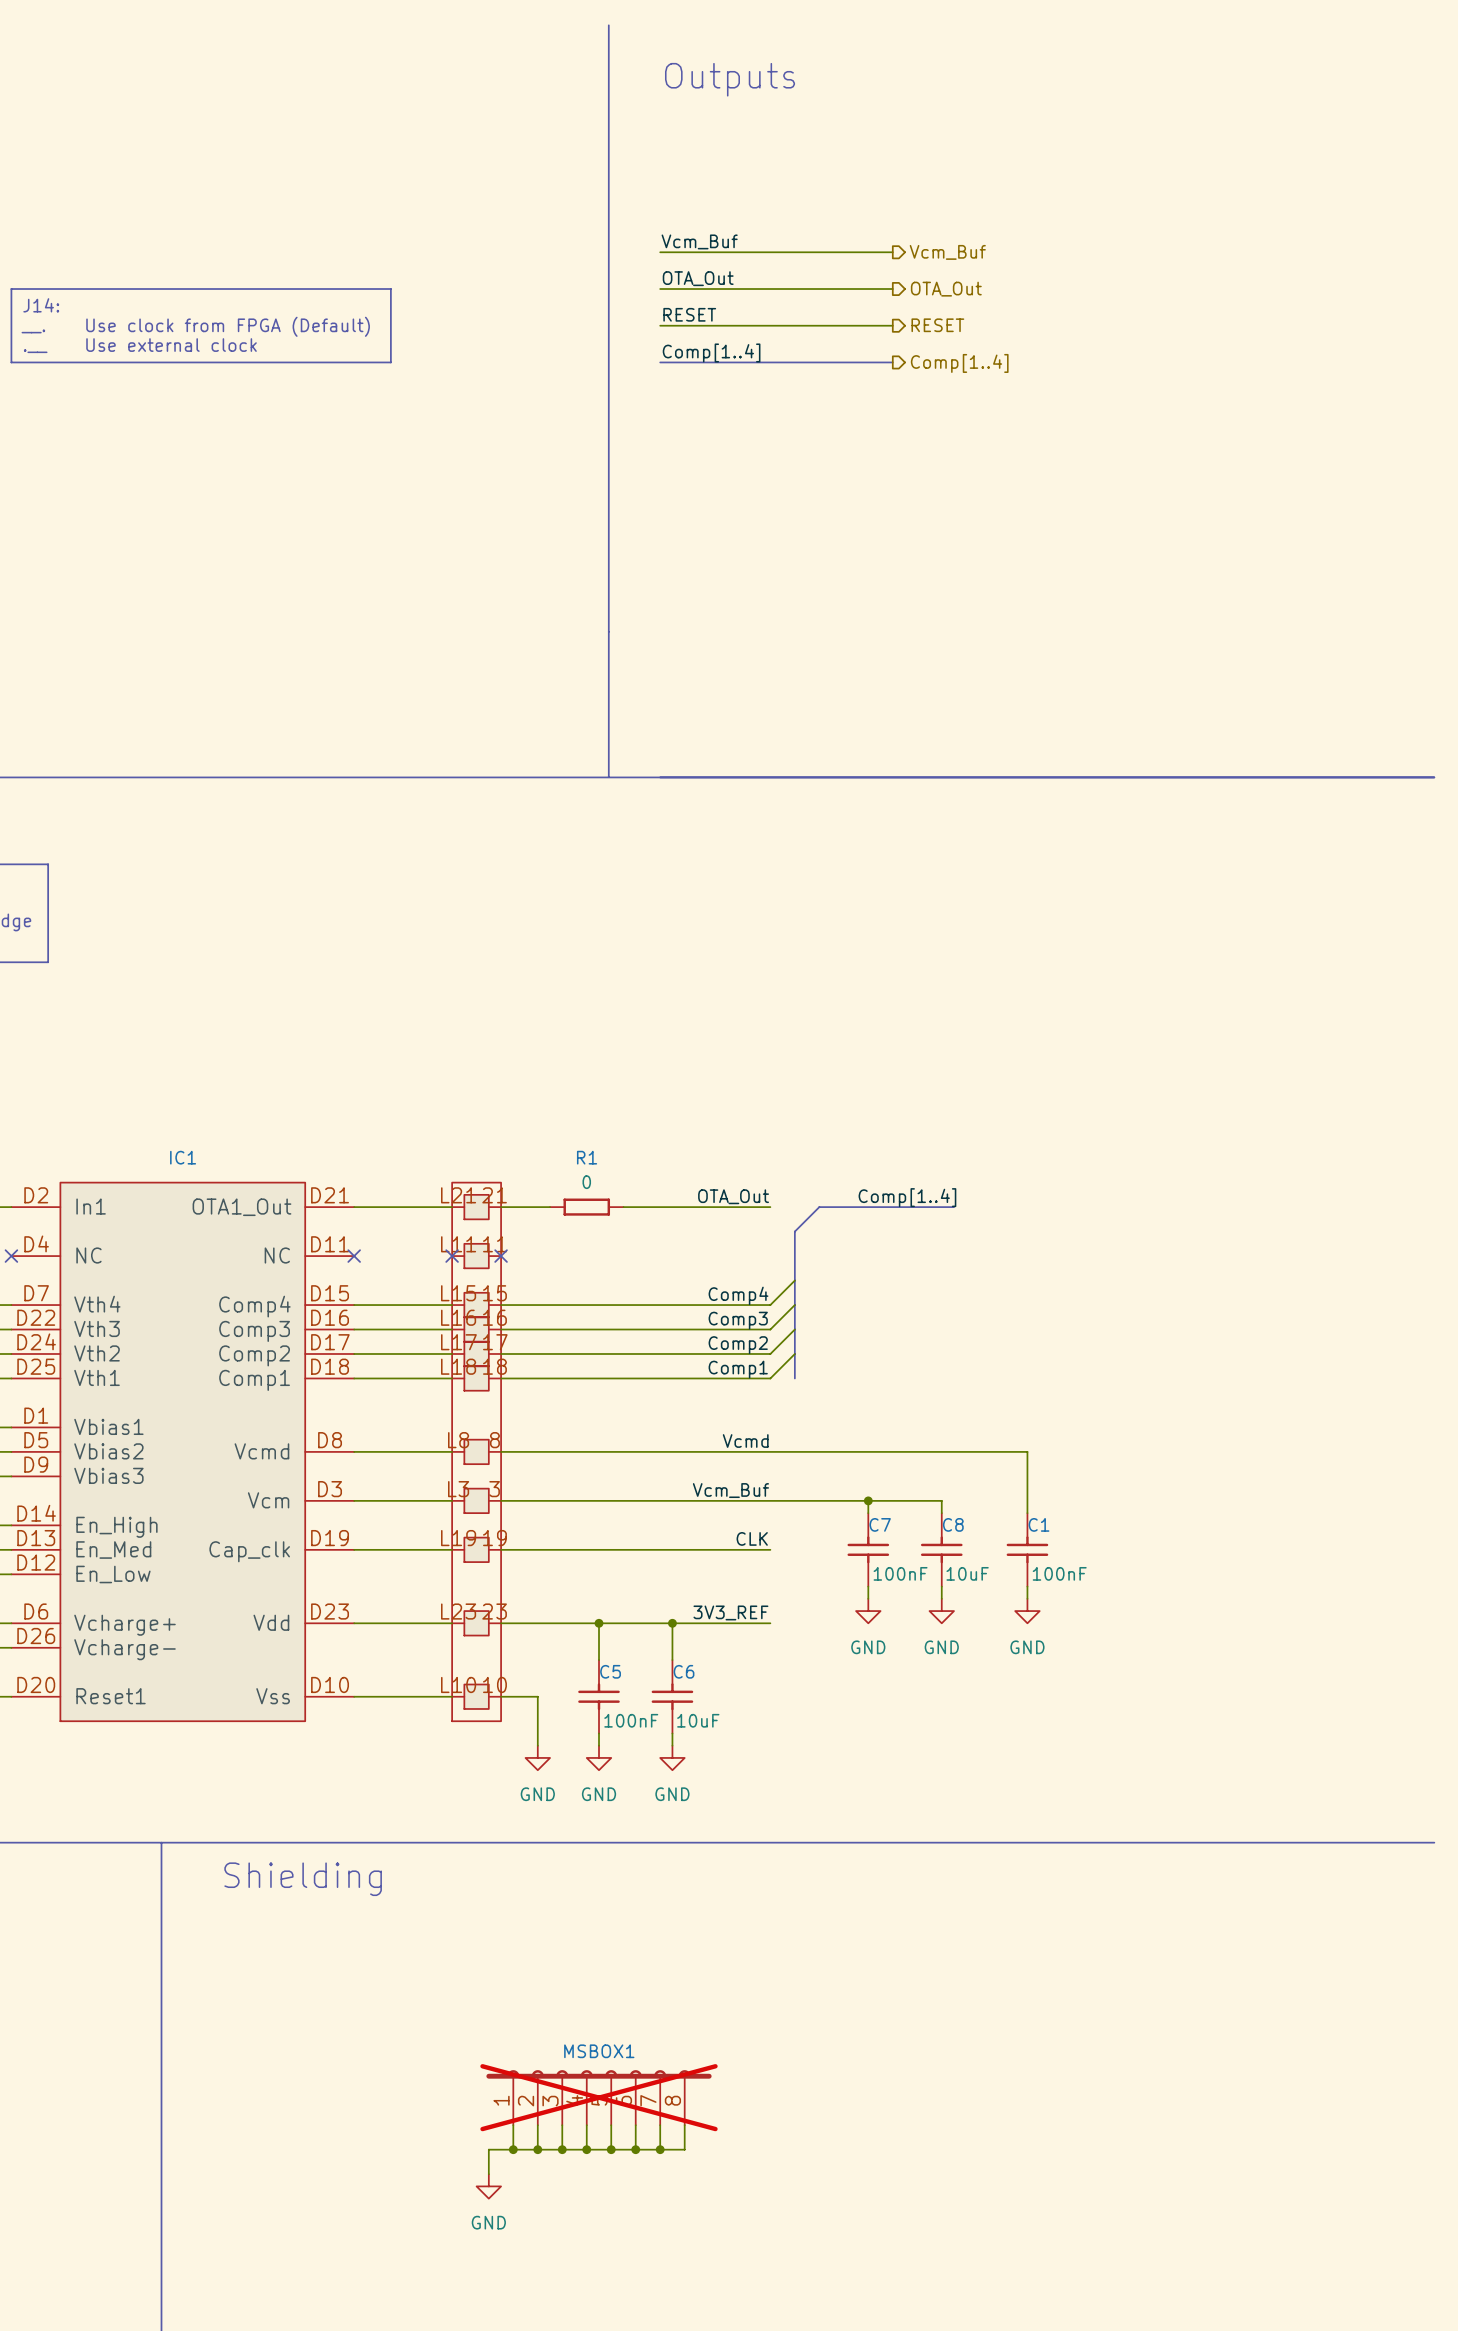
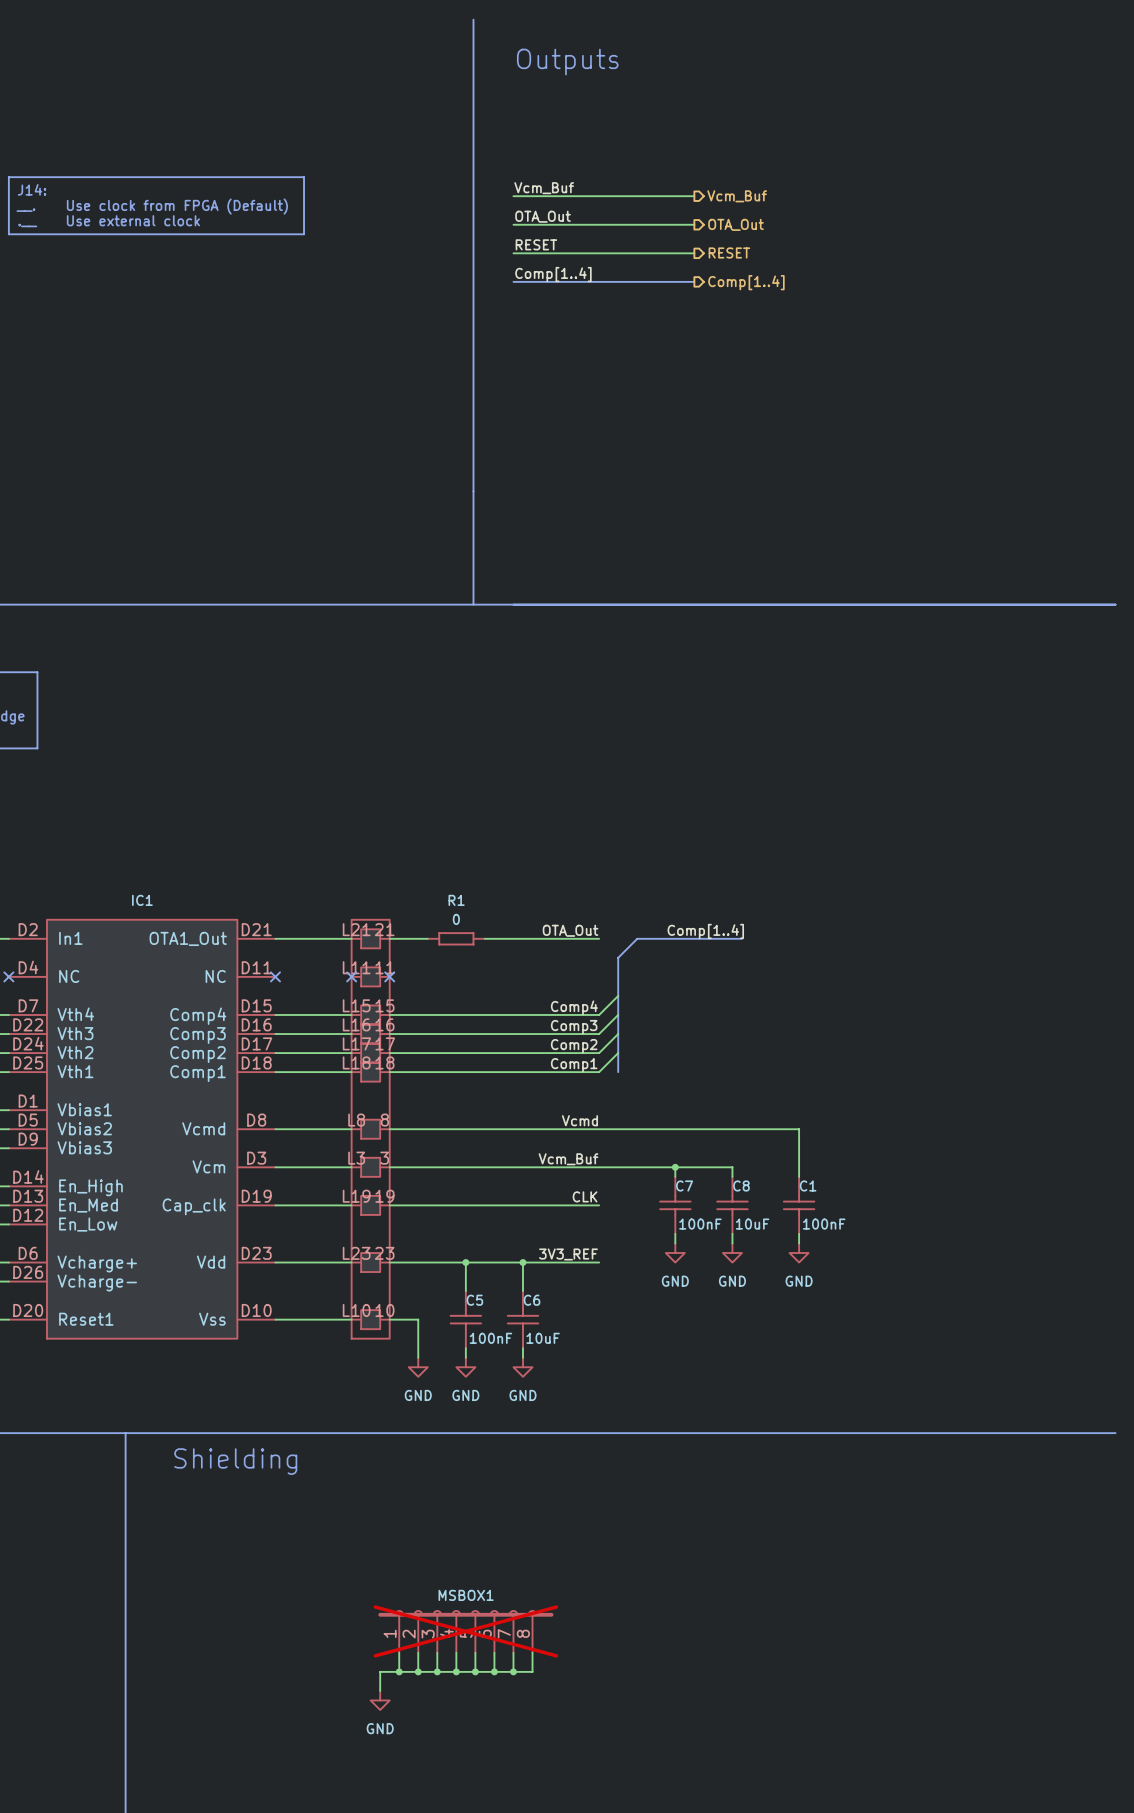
line: (11, 289) (390, 289) -> (8, 224) (8, 177) (304, 177) (304, 224)
line: (11, 301) (11, 362) (390, 362) (390, 301) -> (8, 234) (304, 234)
text position: J14: (41, 305) -> J14: (32, 189)
text position: __. Use clock from FPGA (Default) (195, 326) -> __. Use clock from FPGA (Default) (152, 206)
text position: .__ Use external clock (140, 345) -> .__ Use external clock (109, 221)

